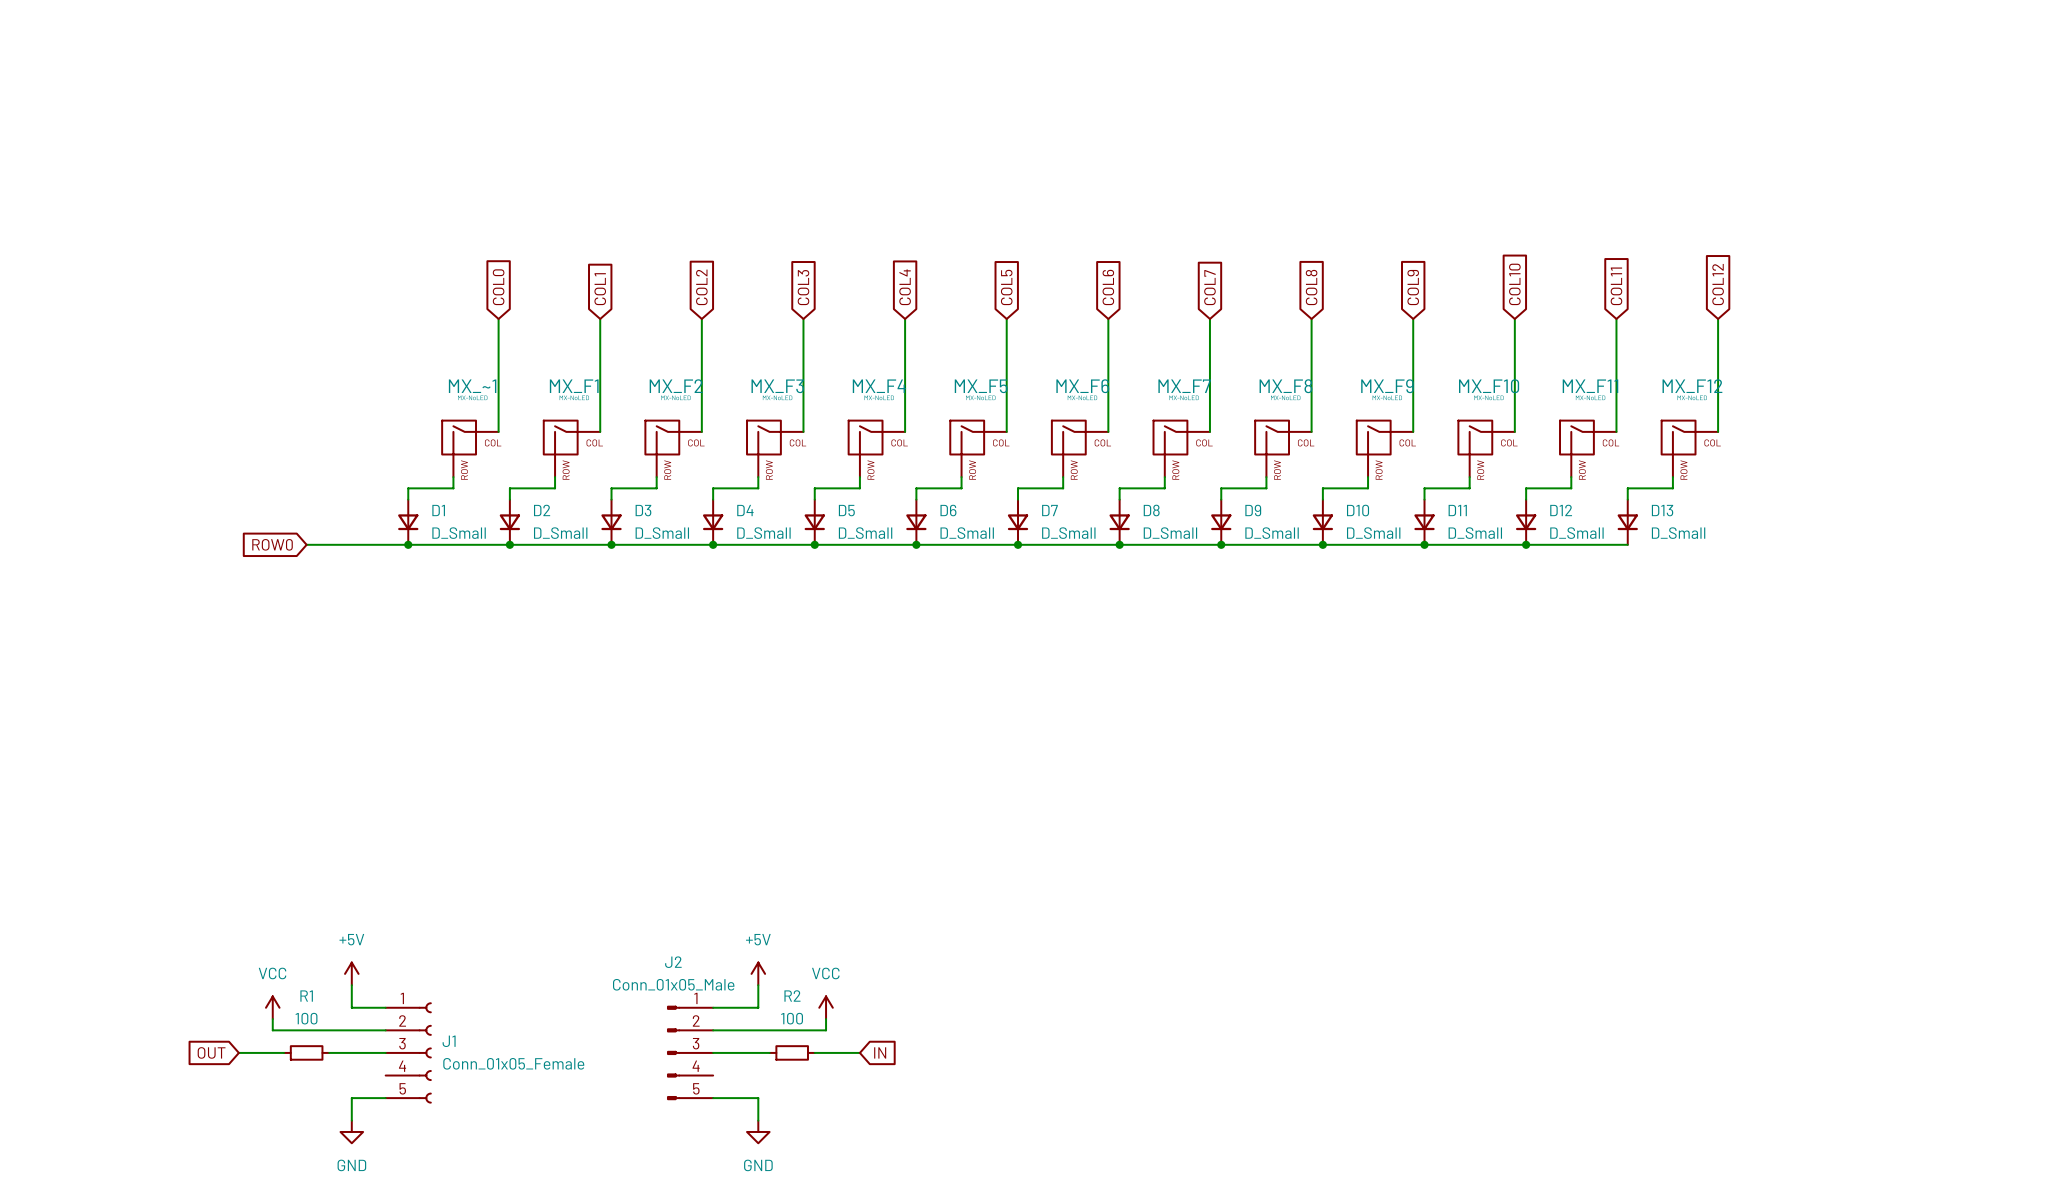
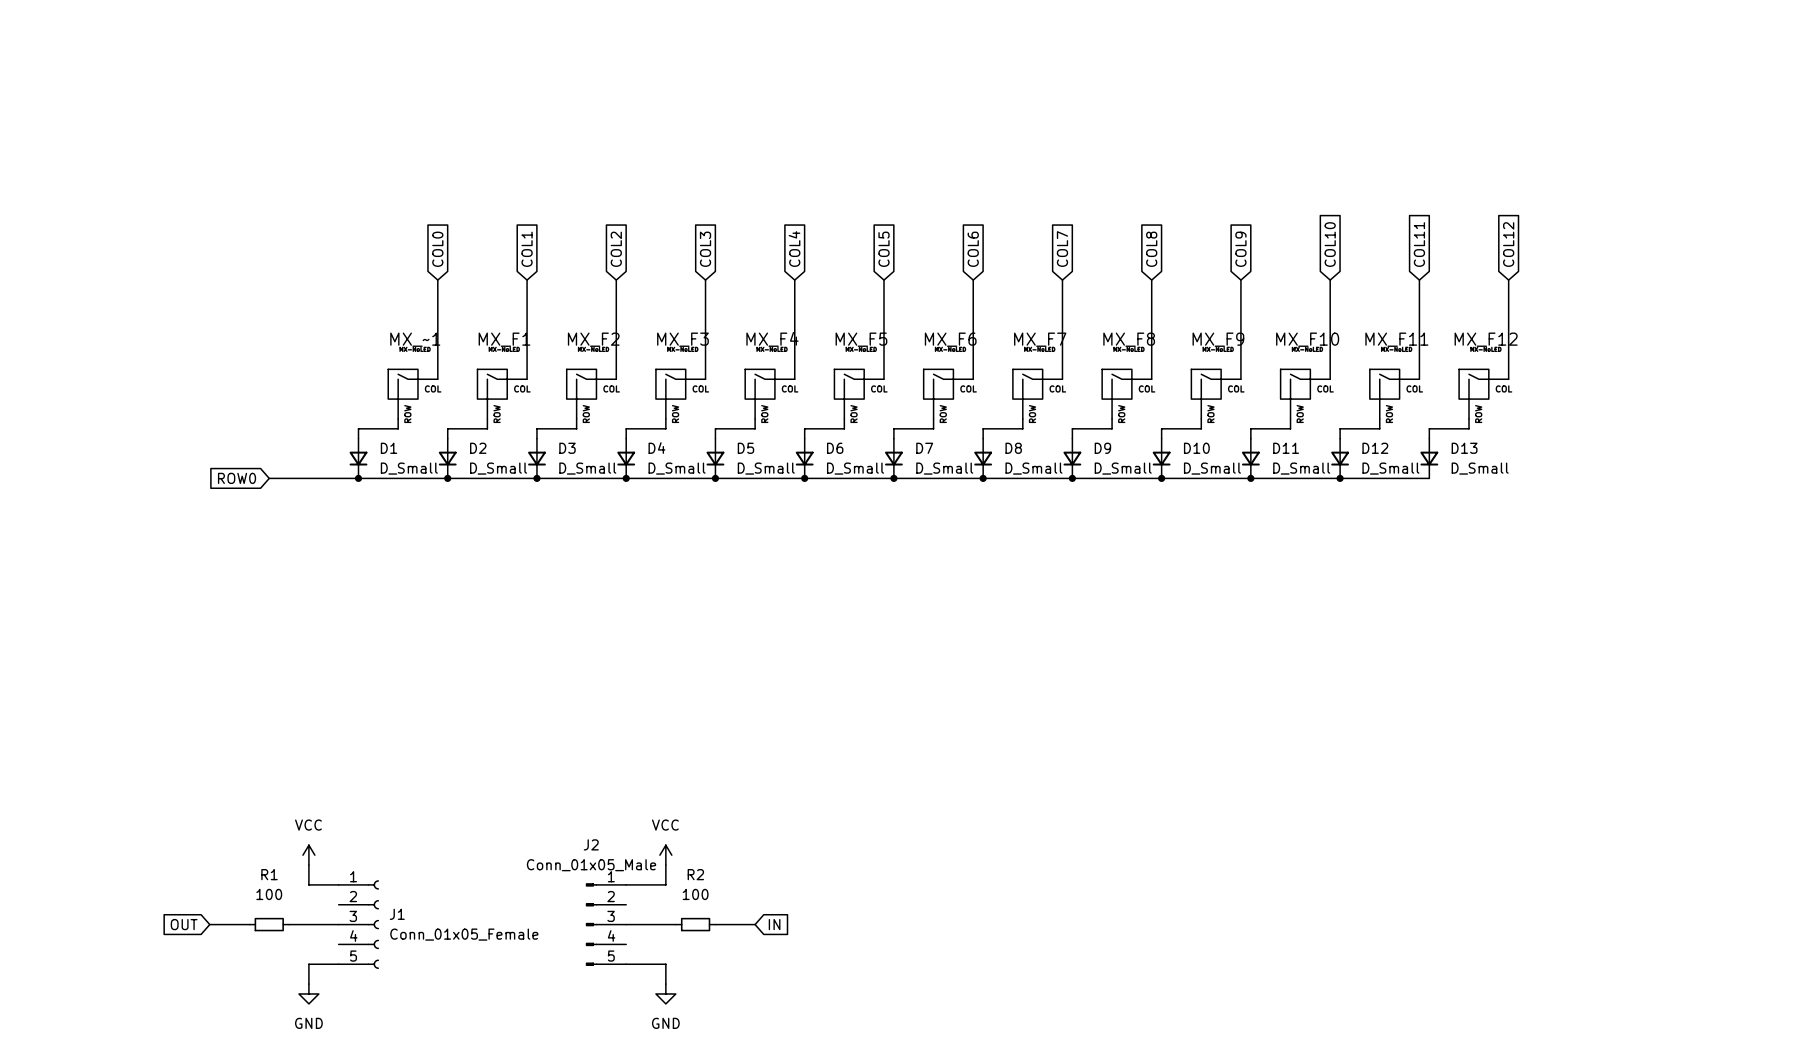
power symbol: +5V (351, 973) -> VCC (308, 855)
power symbol: +5V (758, 973) -> VCC (665, 855)
power symbol: VCC (272, 1007) -> none
power symbol: VCC (826, 1007) -> none
wire: (272, 1019) (272, 1030) (385, 1030) -> none
wire: (826, 1019) (826, 1030) (713, 1030) -> none

